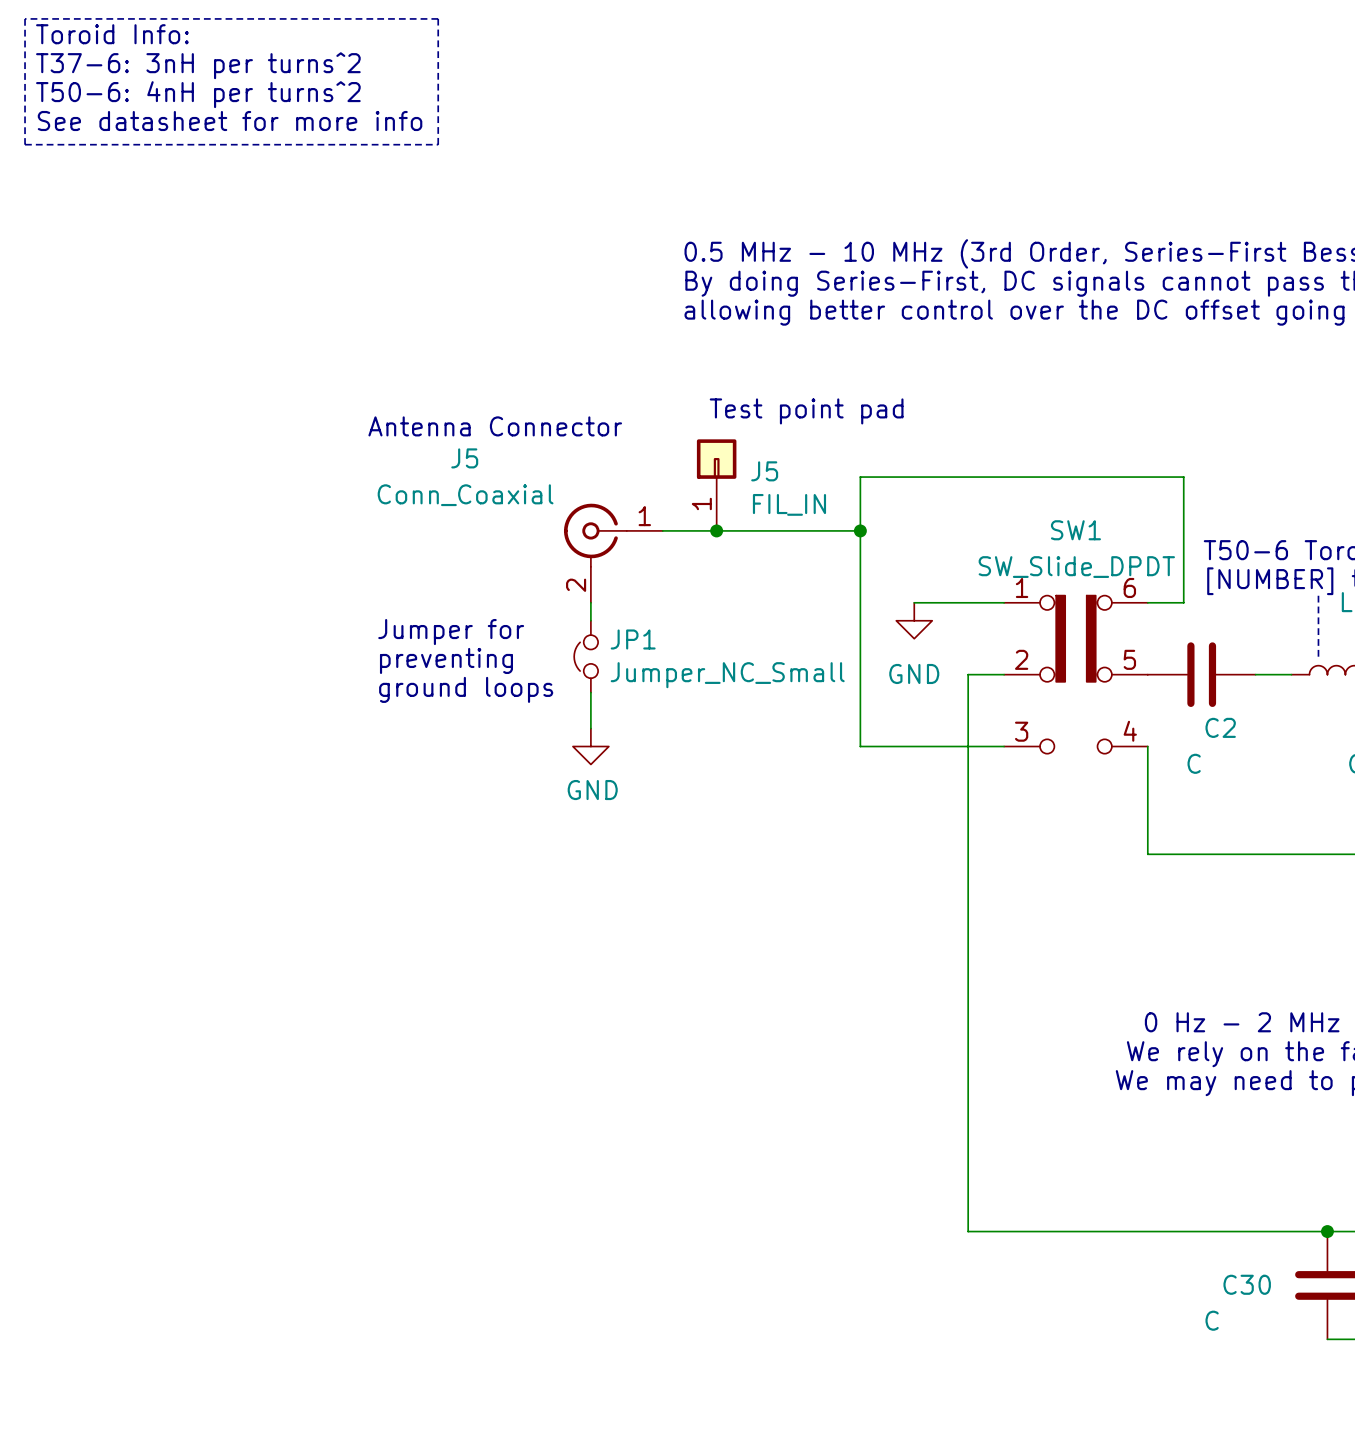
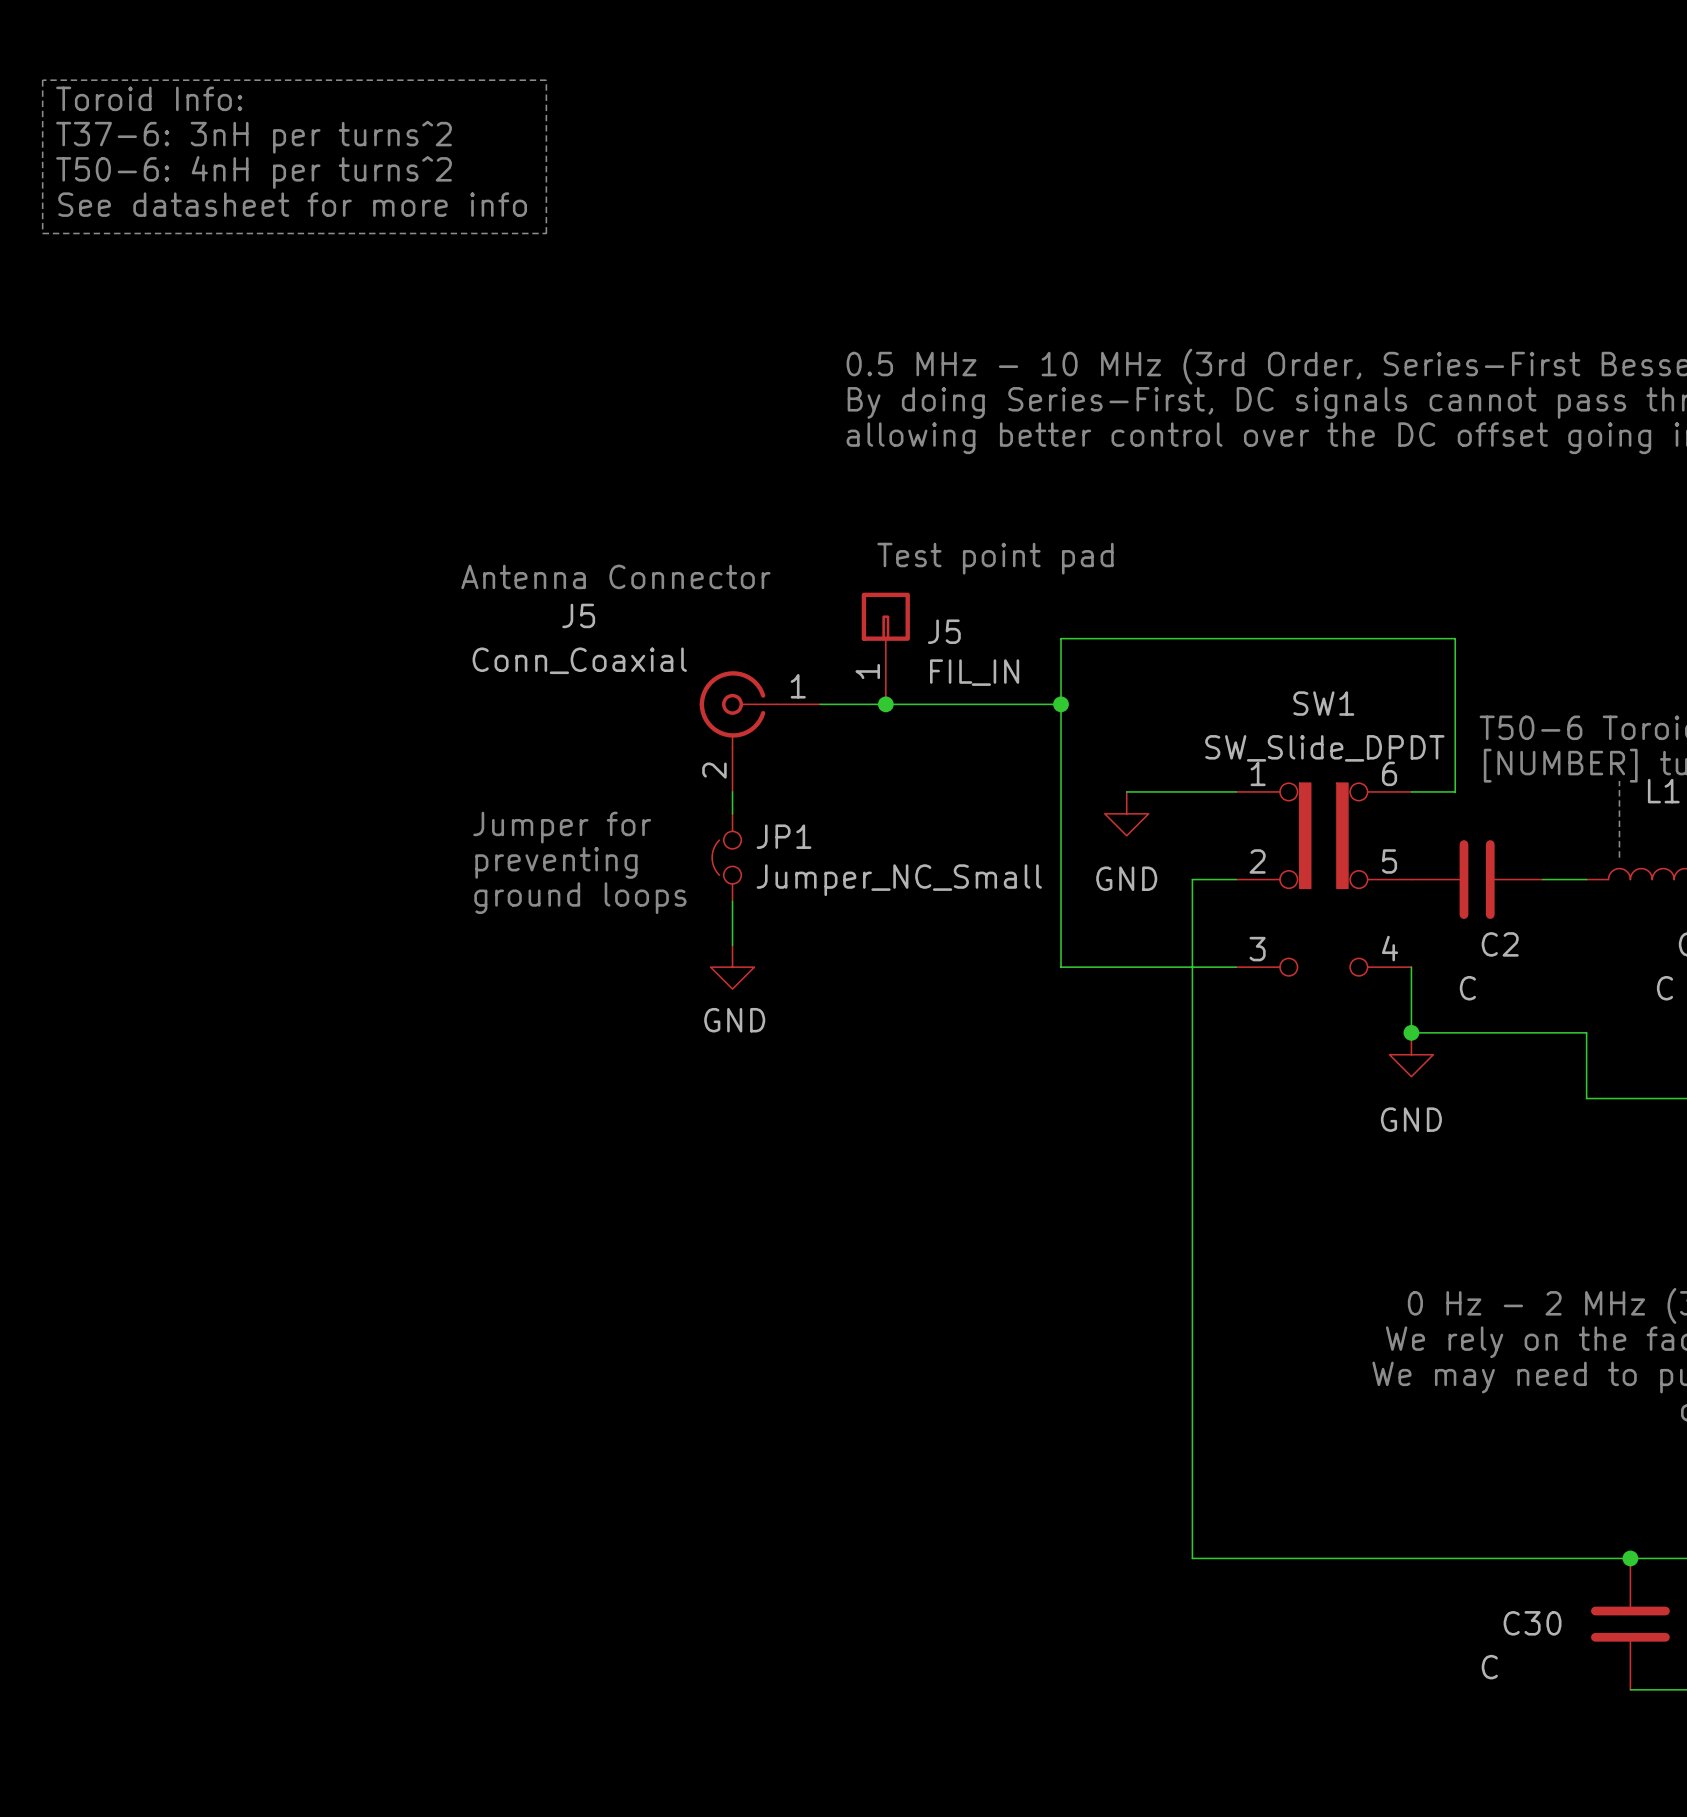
wire: (1147, 800) (1147, 854) (1291, 854) -> (1411, 1032) (1586, 1032) (1586, 1098)
junction: none -> (1411, 1032)
power symbol: none -> GND (1411, 1054)

